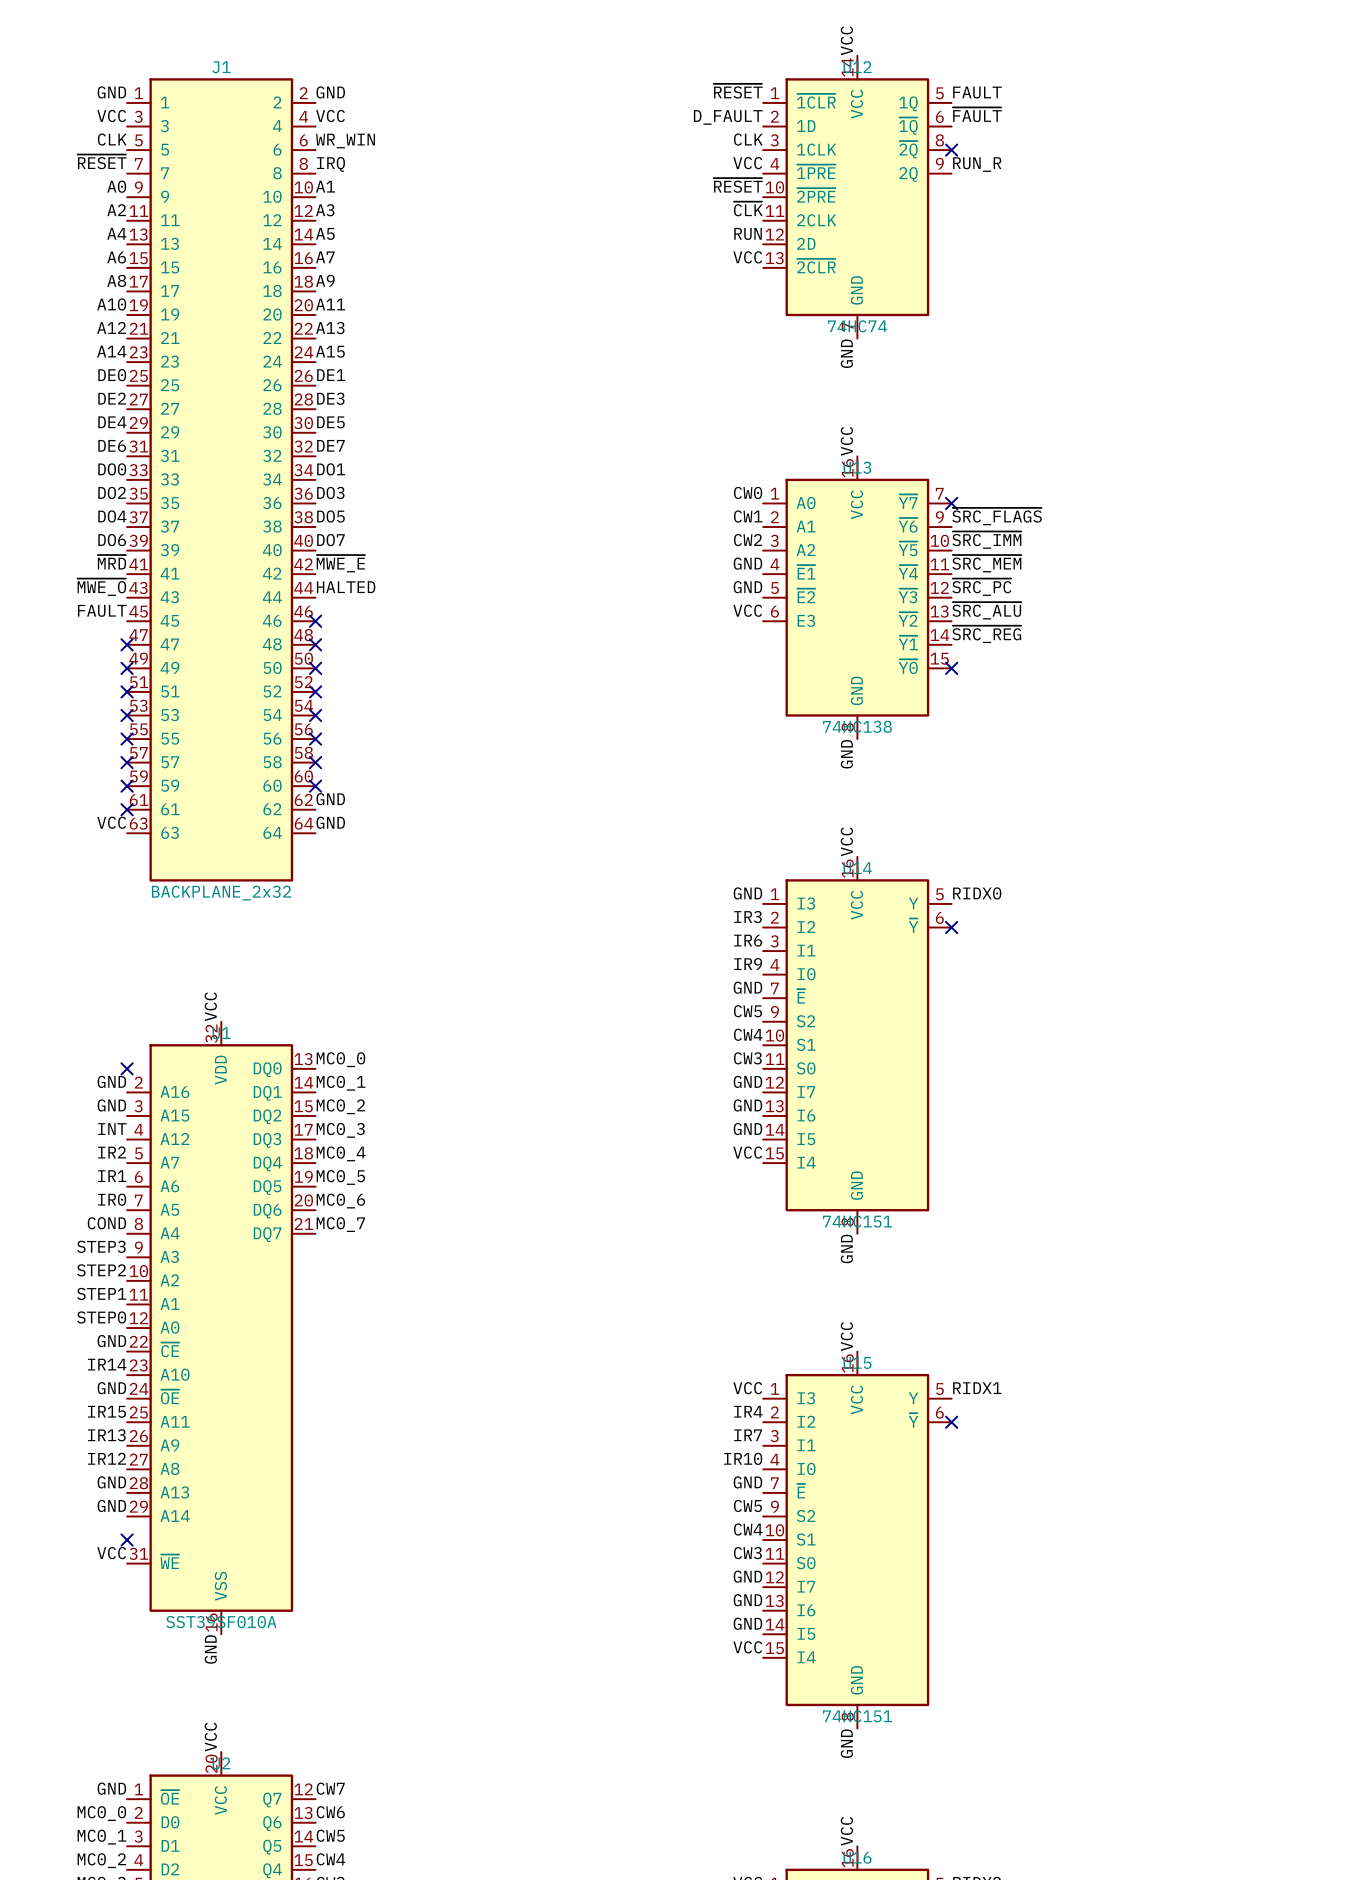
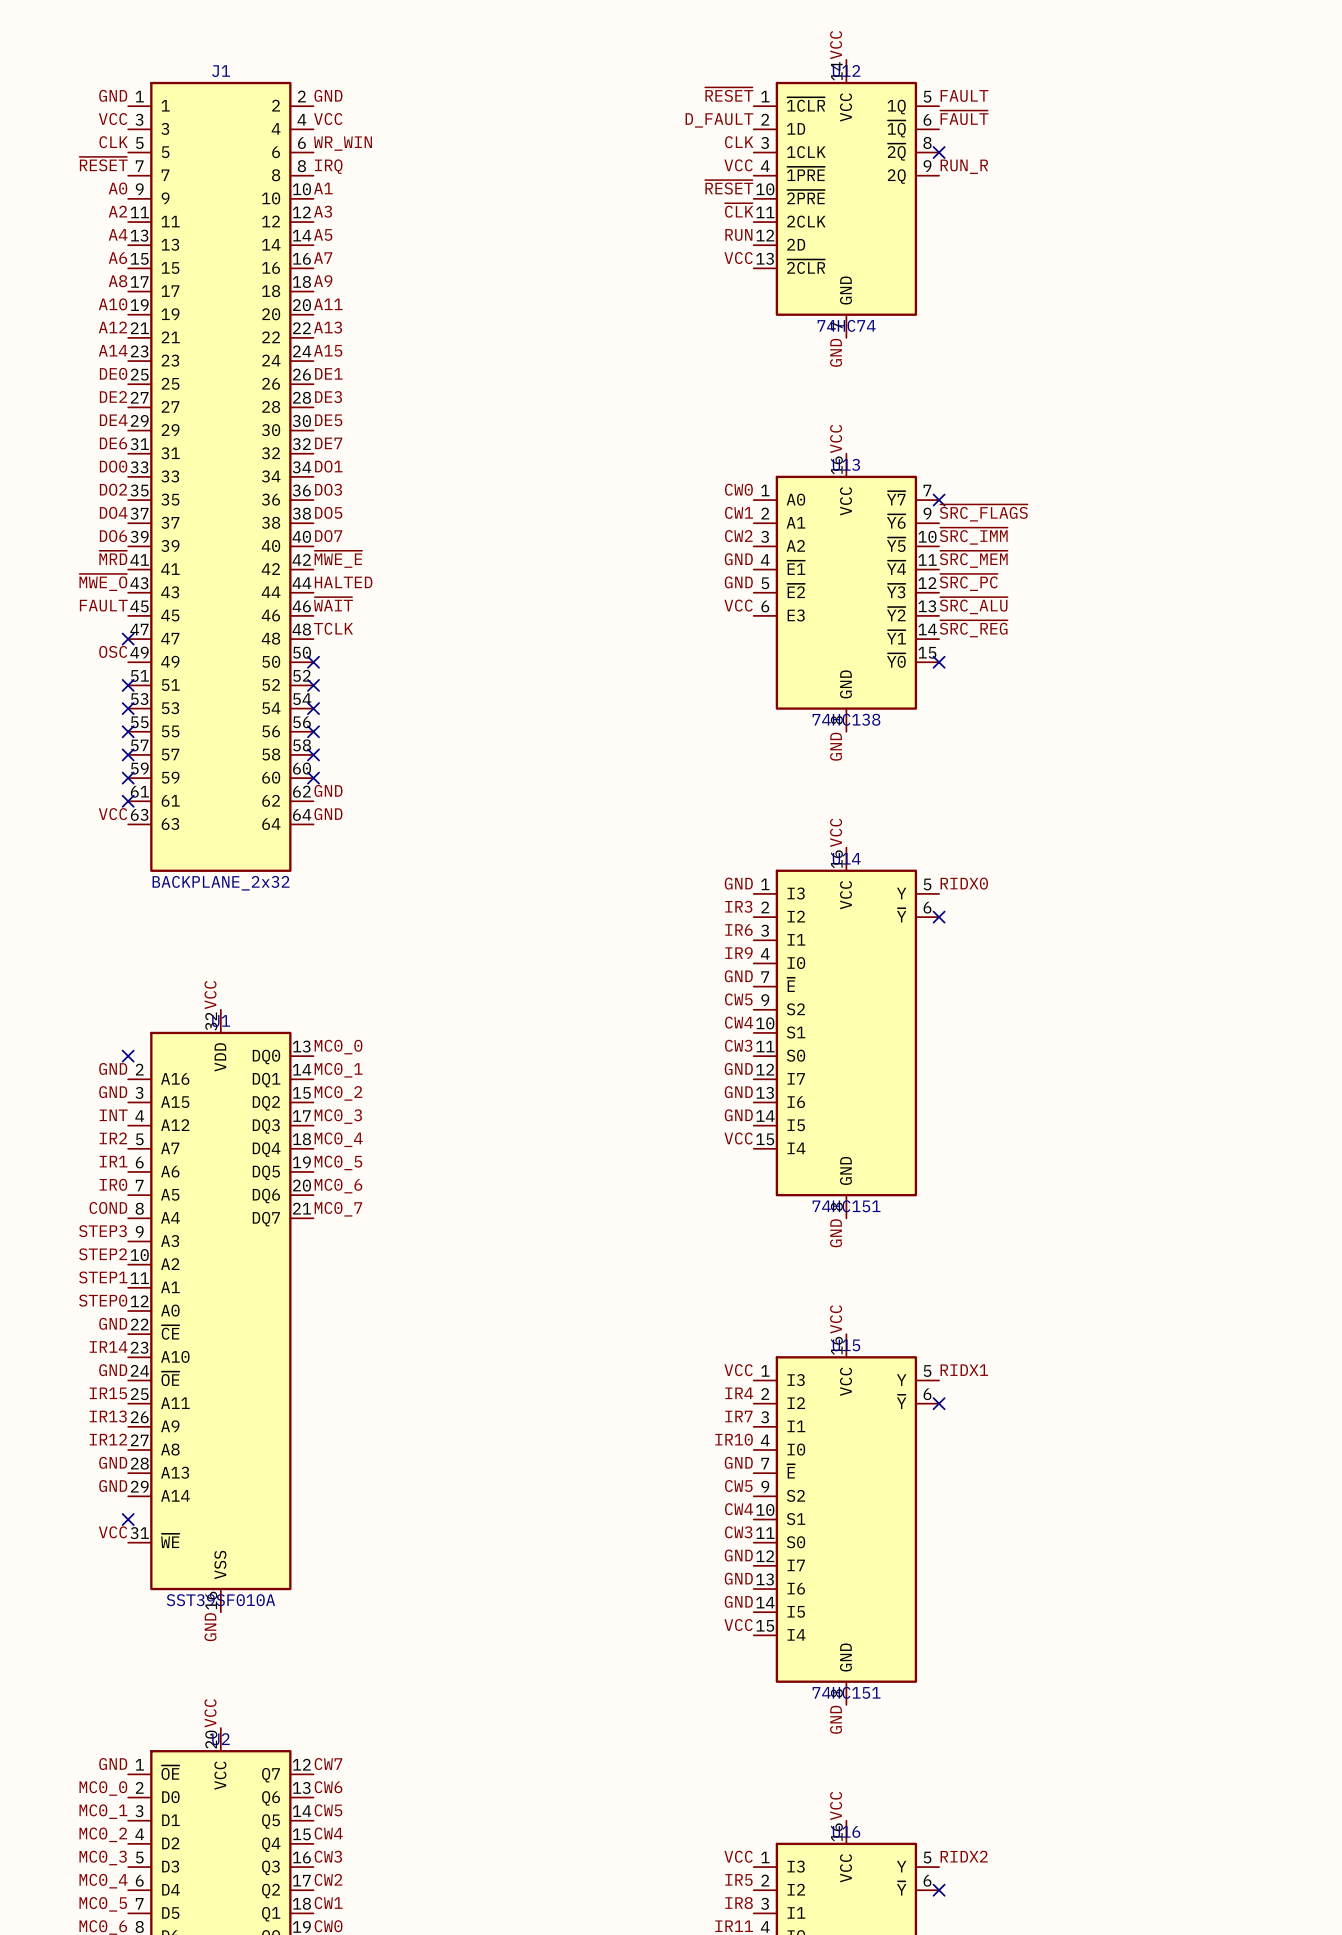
label: none -> ~{WAIT} (333, 604)
no-connect mark: (315, 621) -> none
label: none -> TCLK (333, 628)
no-connect mark: (315, 644) -> none
label: none -> OSC (113, 651)
no-connect mark: (127, 668) -> none

